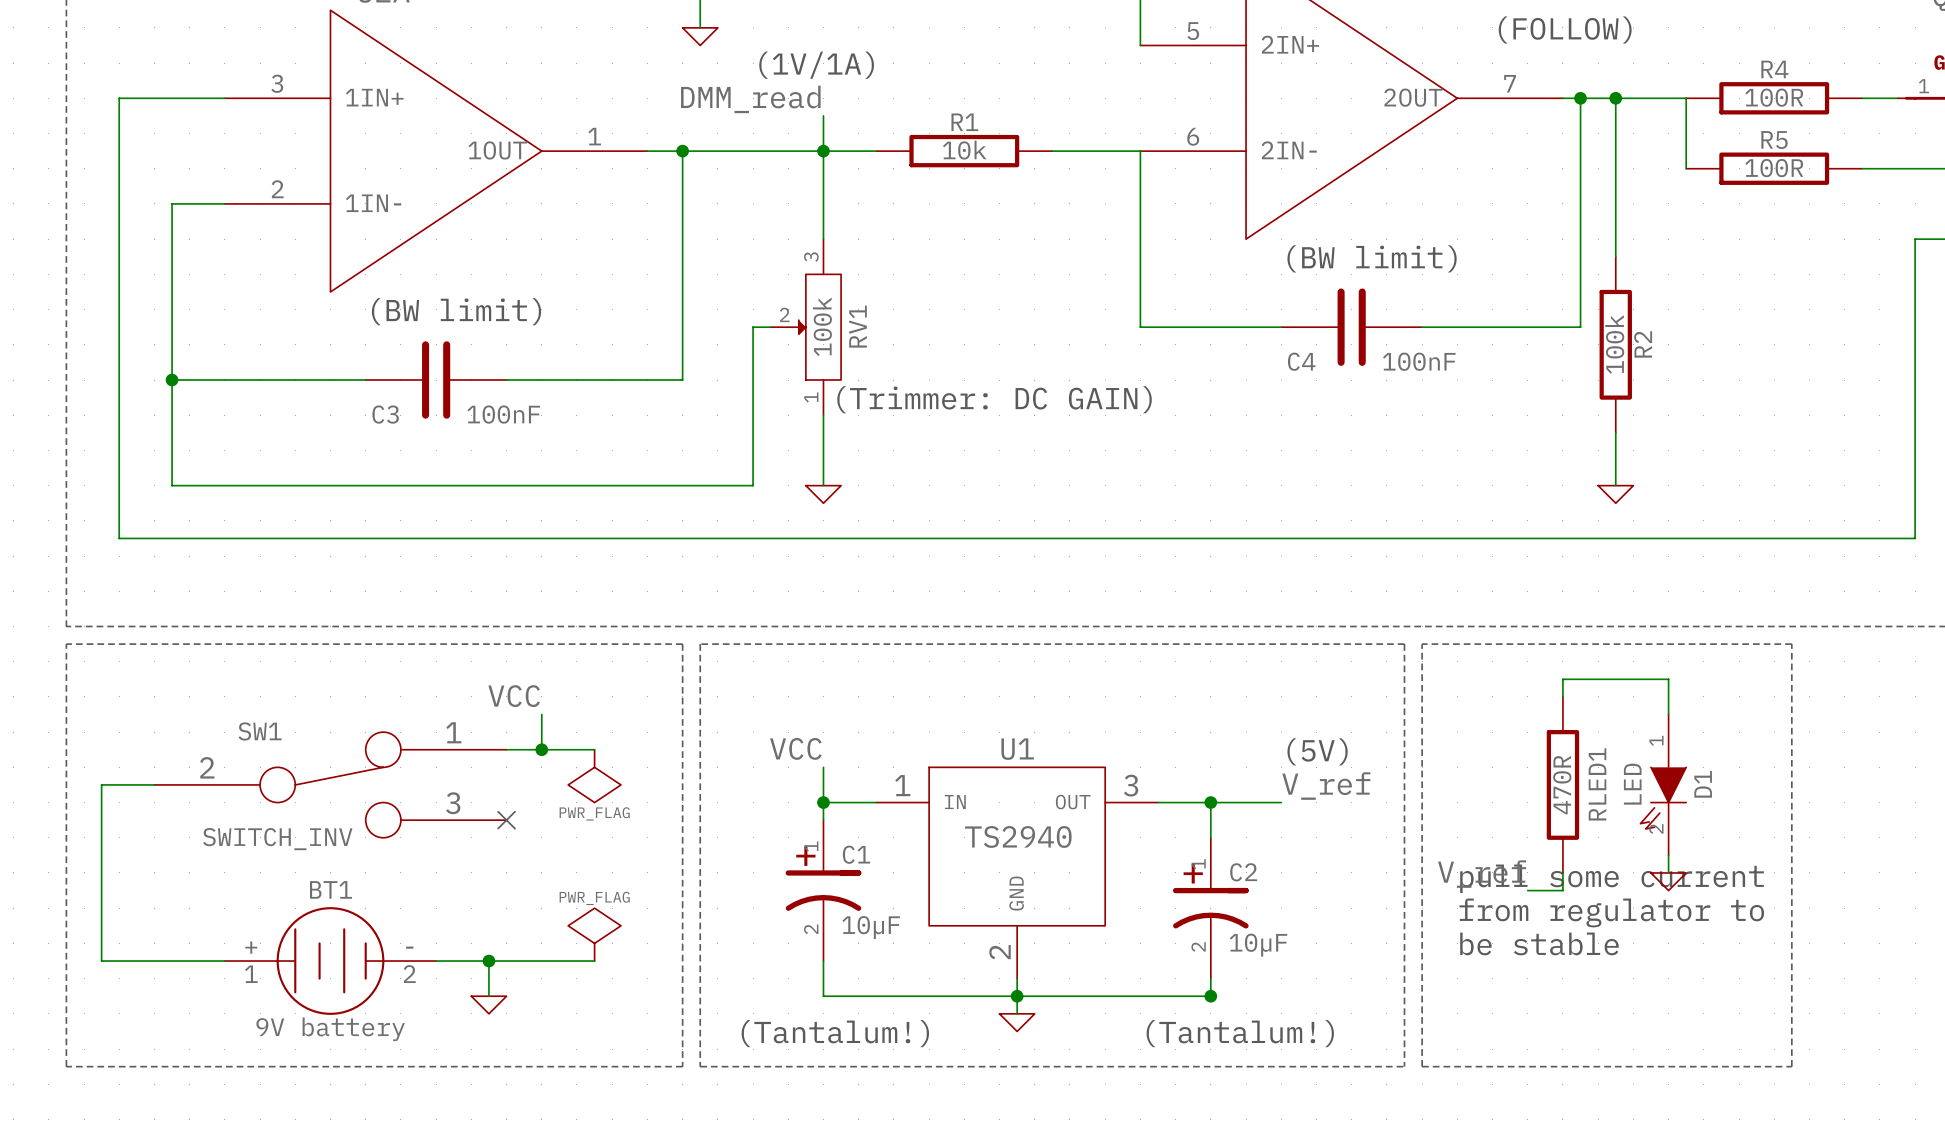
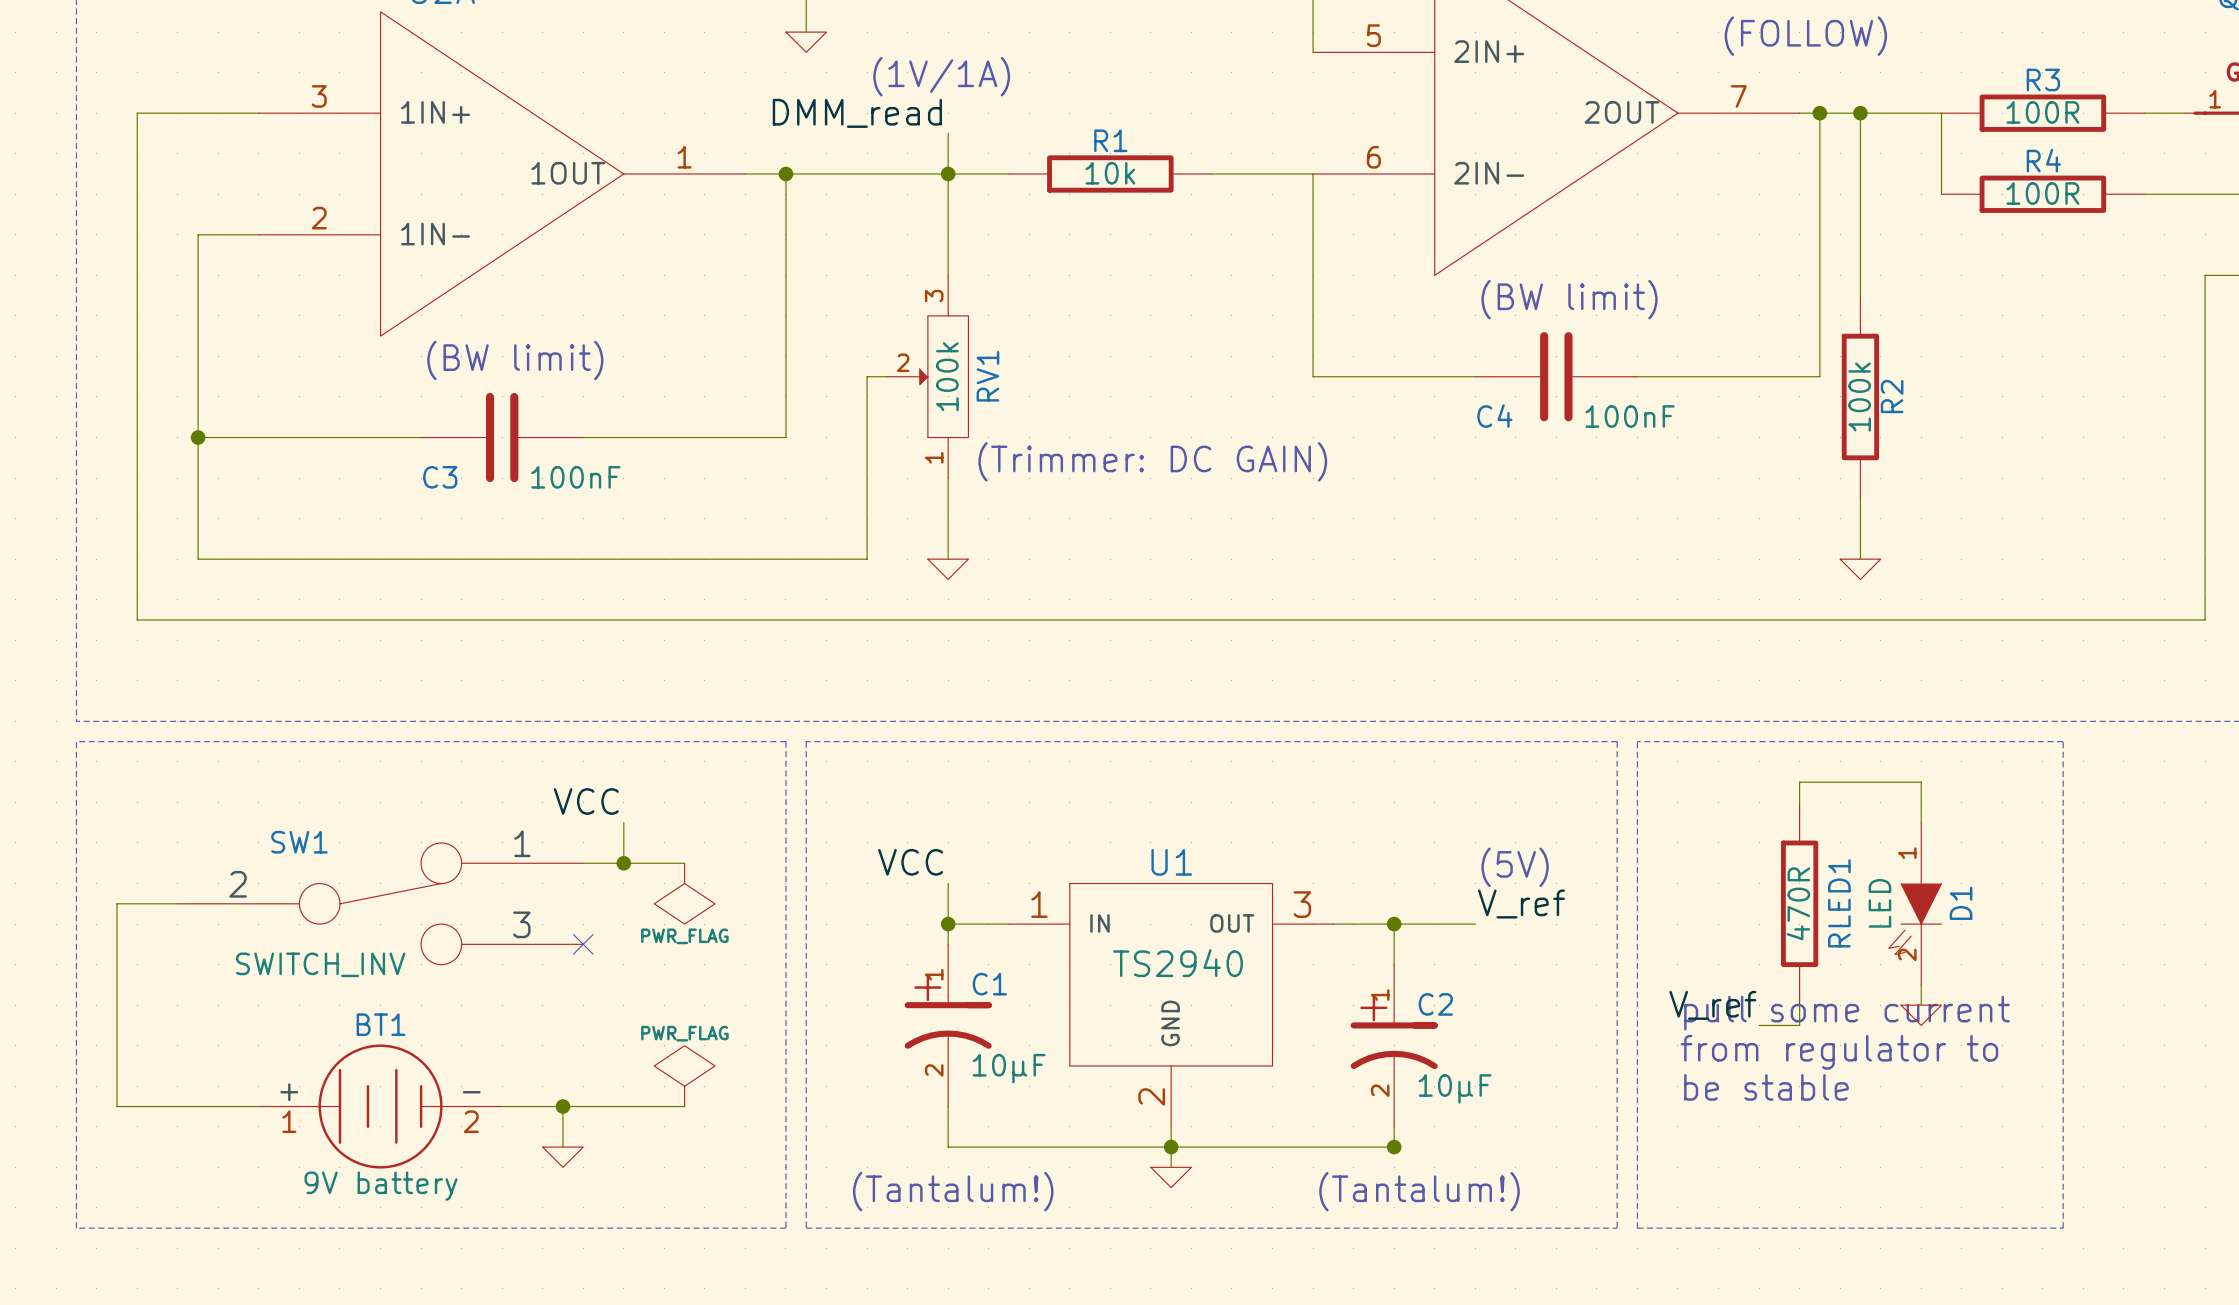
R4 name: R4 (1774, 69) -> R3 (2043, 79)
R5 name: R5 (1774, 140) -> R4 (2043, 160)

